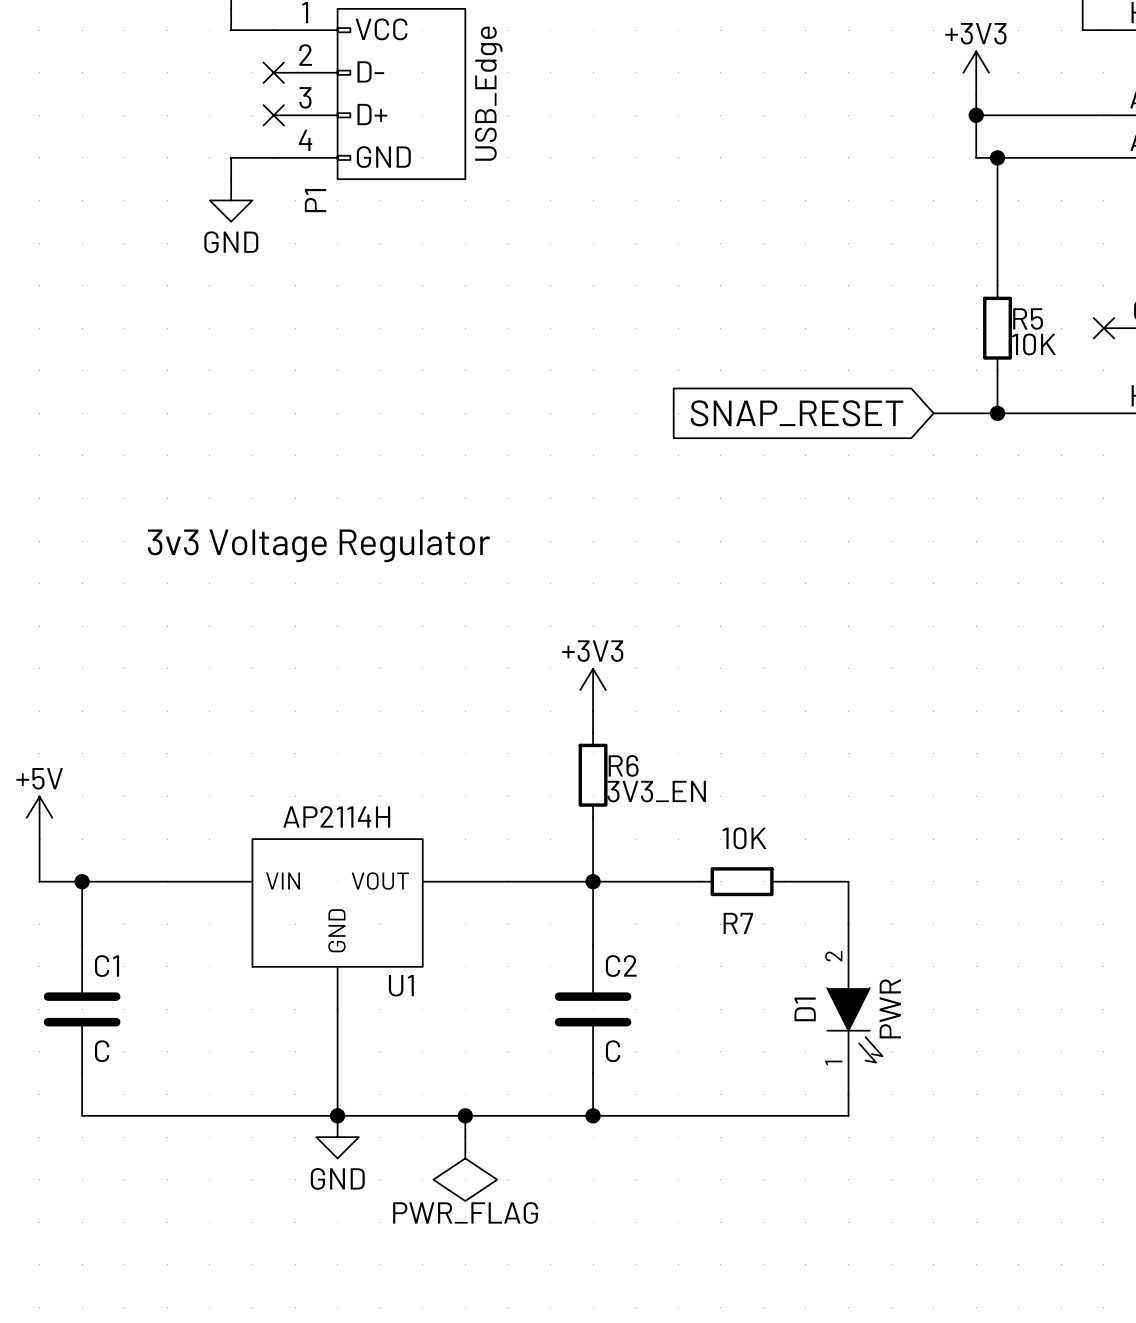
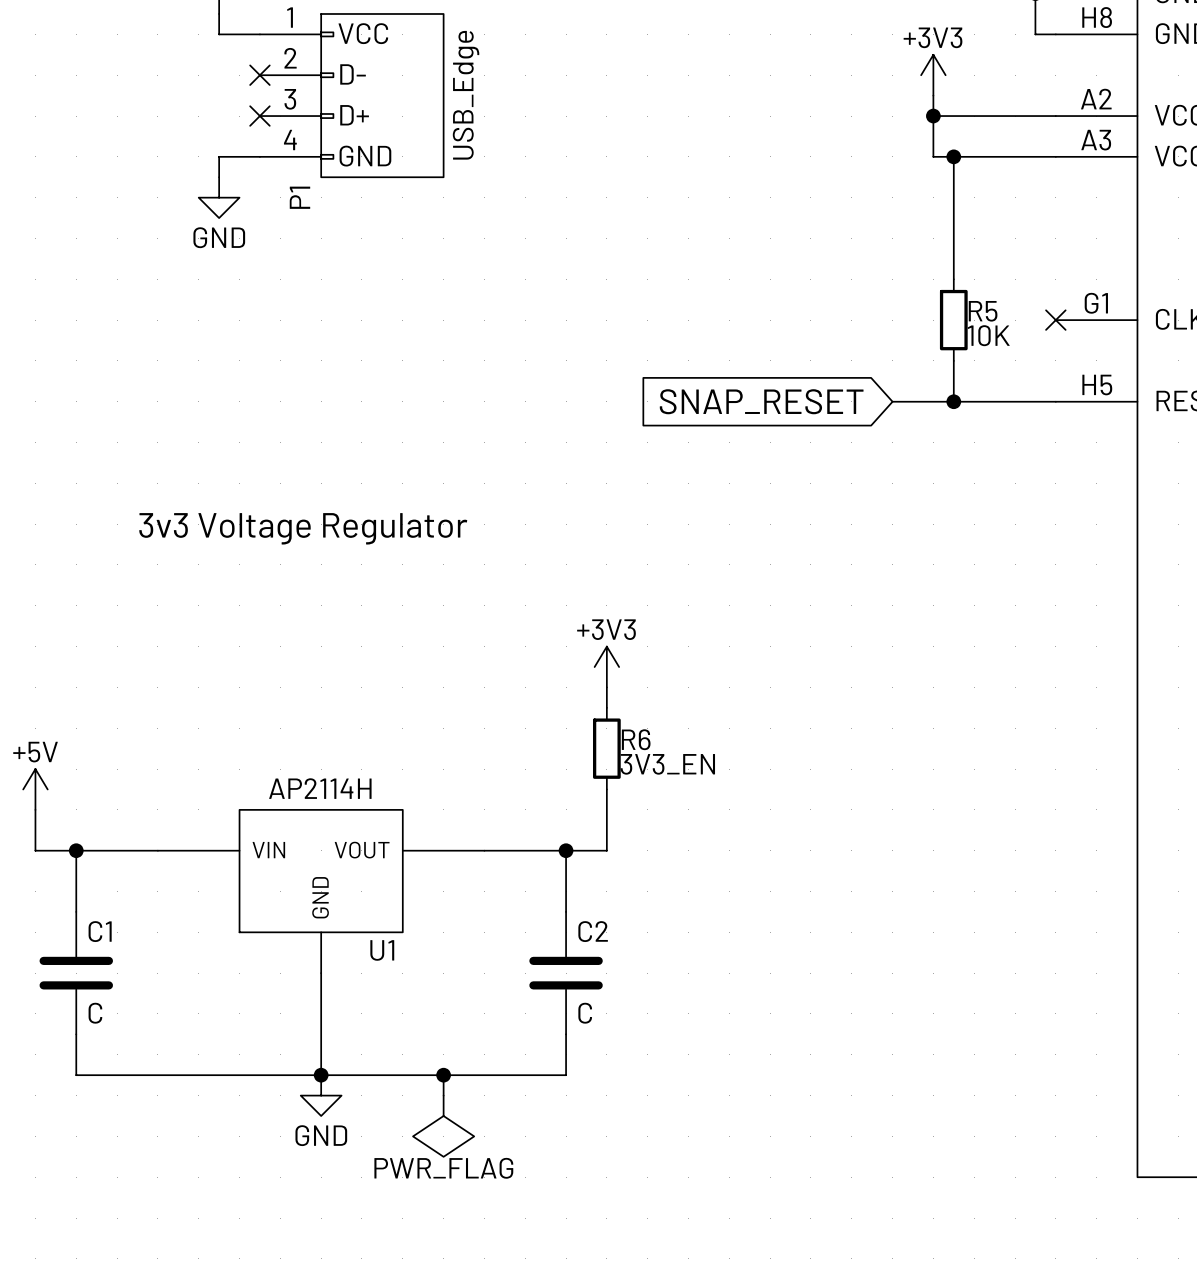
power symbol position: +3V3 (593, 690) -> +3V3 (606, 667)
wire: (593, 711) (593, 732) -> (606, 687) (606, 707)
R6 position: (593, 775) -> (606, 748)
wire: (593, 817) (593, 881) -> none
wire: (635, 881) (699, 881) -> (606, 850) (606, 789)
R7: 10K (742, 881) -> none
wire: (784, 881) (848, 881) (848, 924) -> none
D1: PWR (854, 1009) -> none
wire: (848, 1094) (848, 1115) (593, 1115) -> none
junction: (593, 1115) -> none

